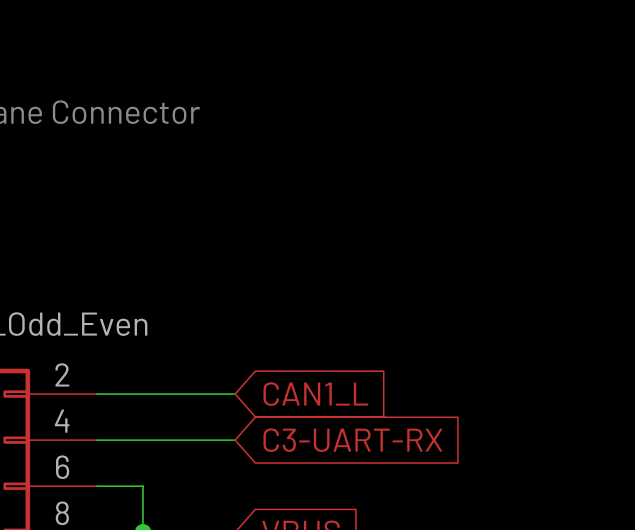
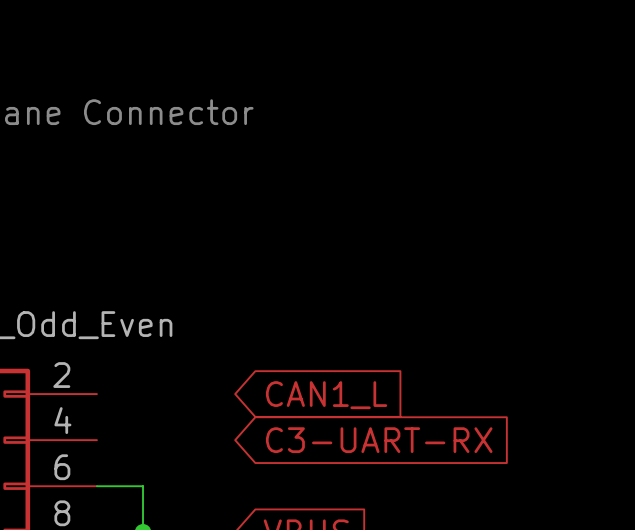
wire: (96, 394) (235, 394) -> none
wire: (96, 440) (235, 440) -> none

